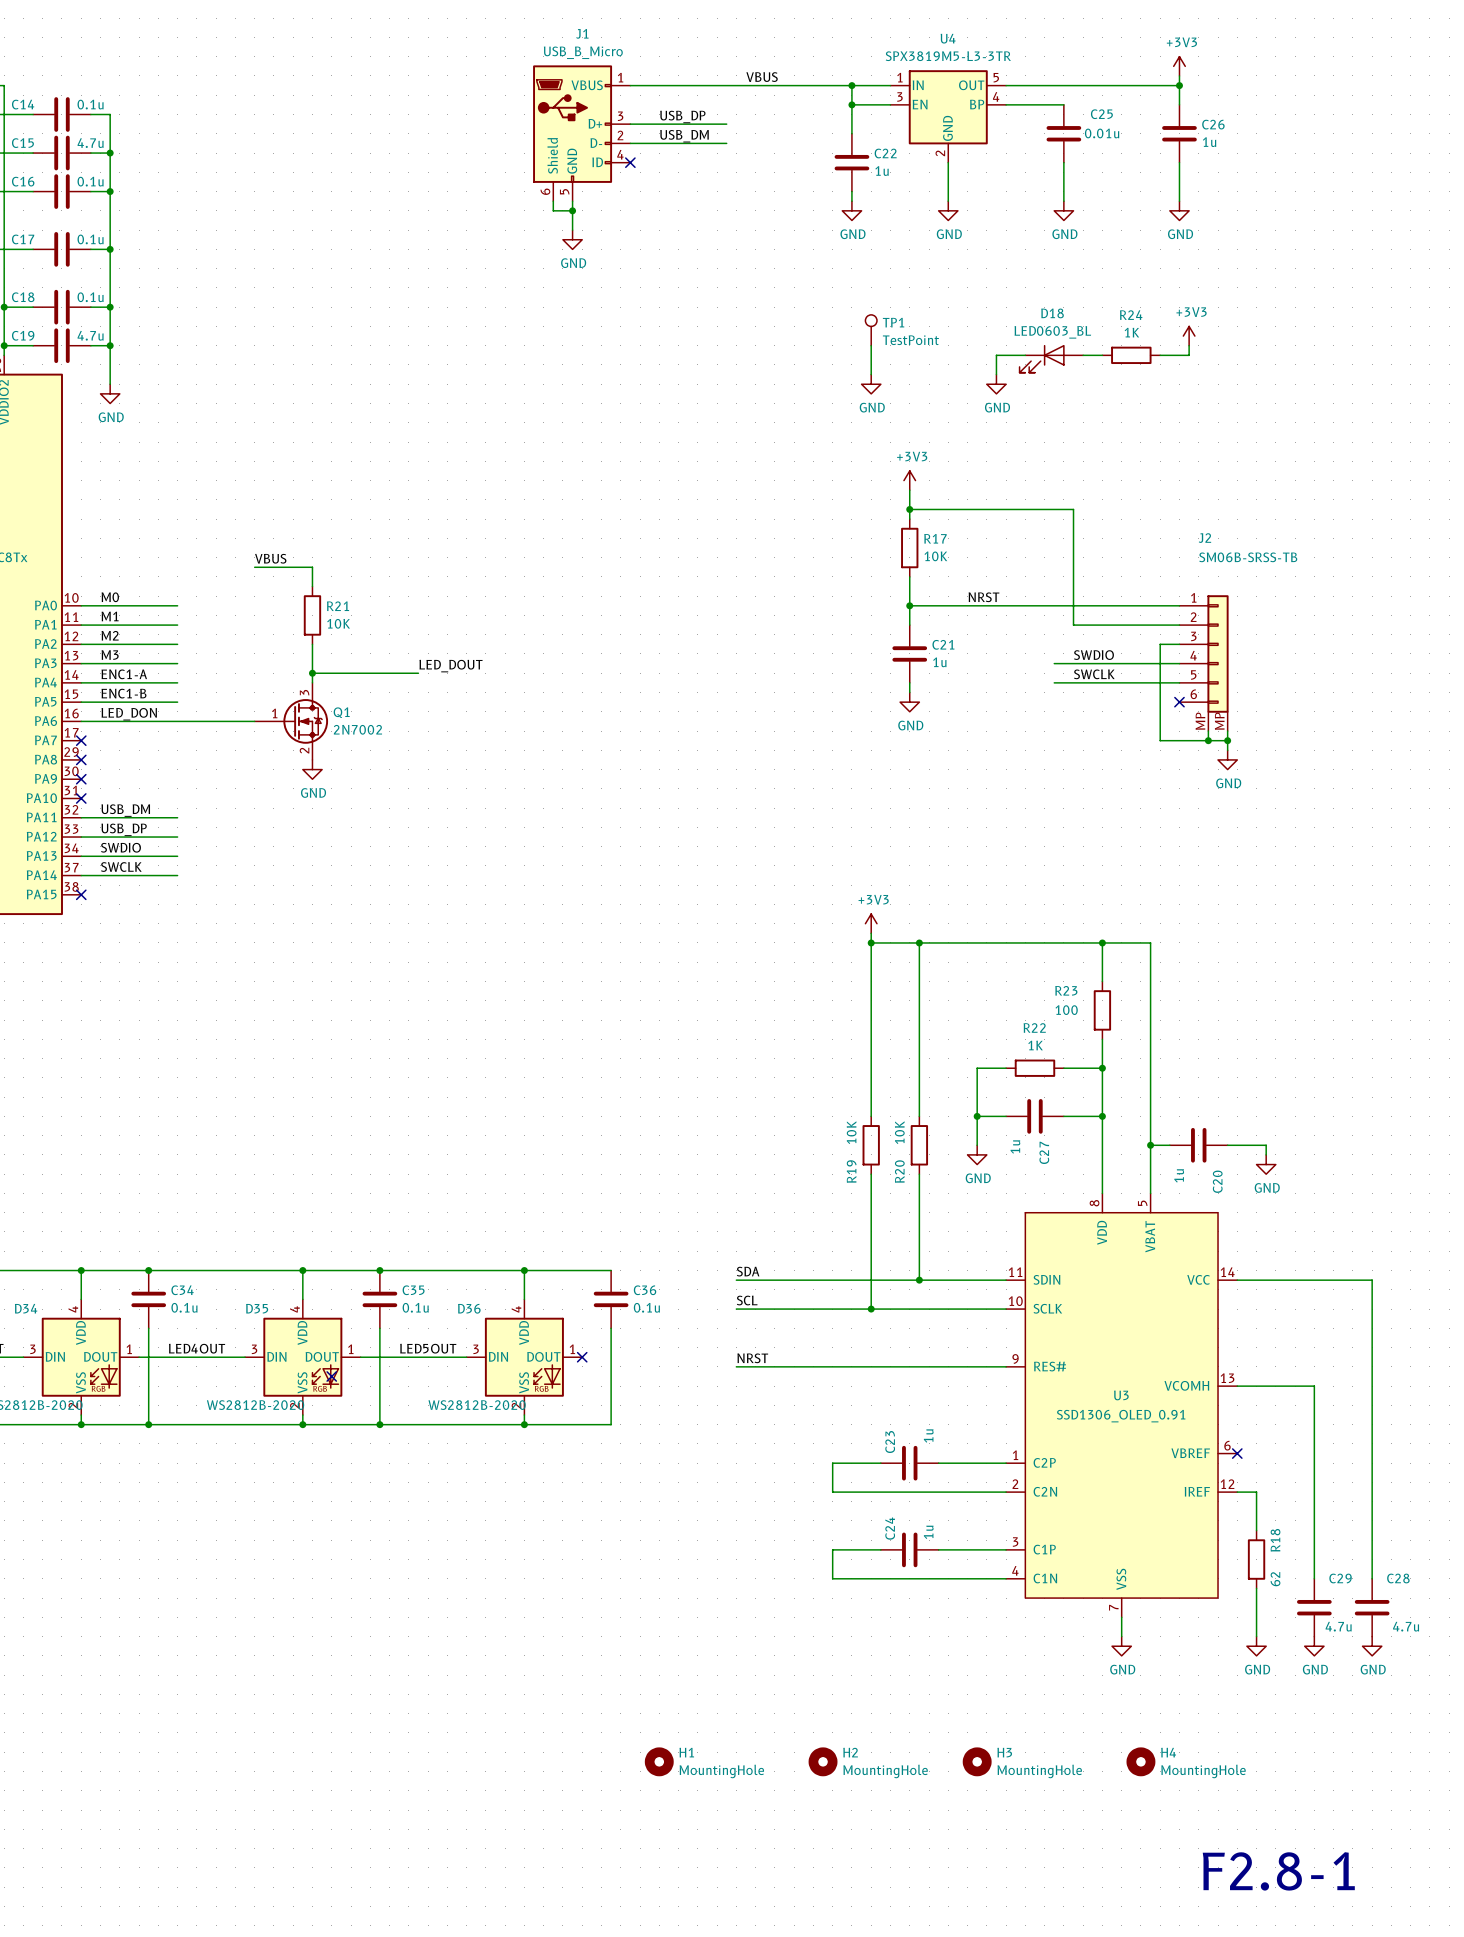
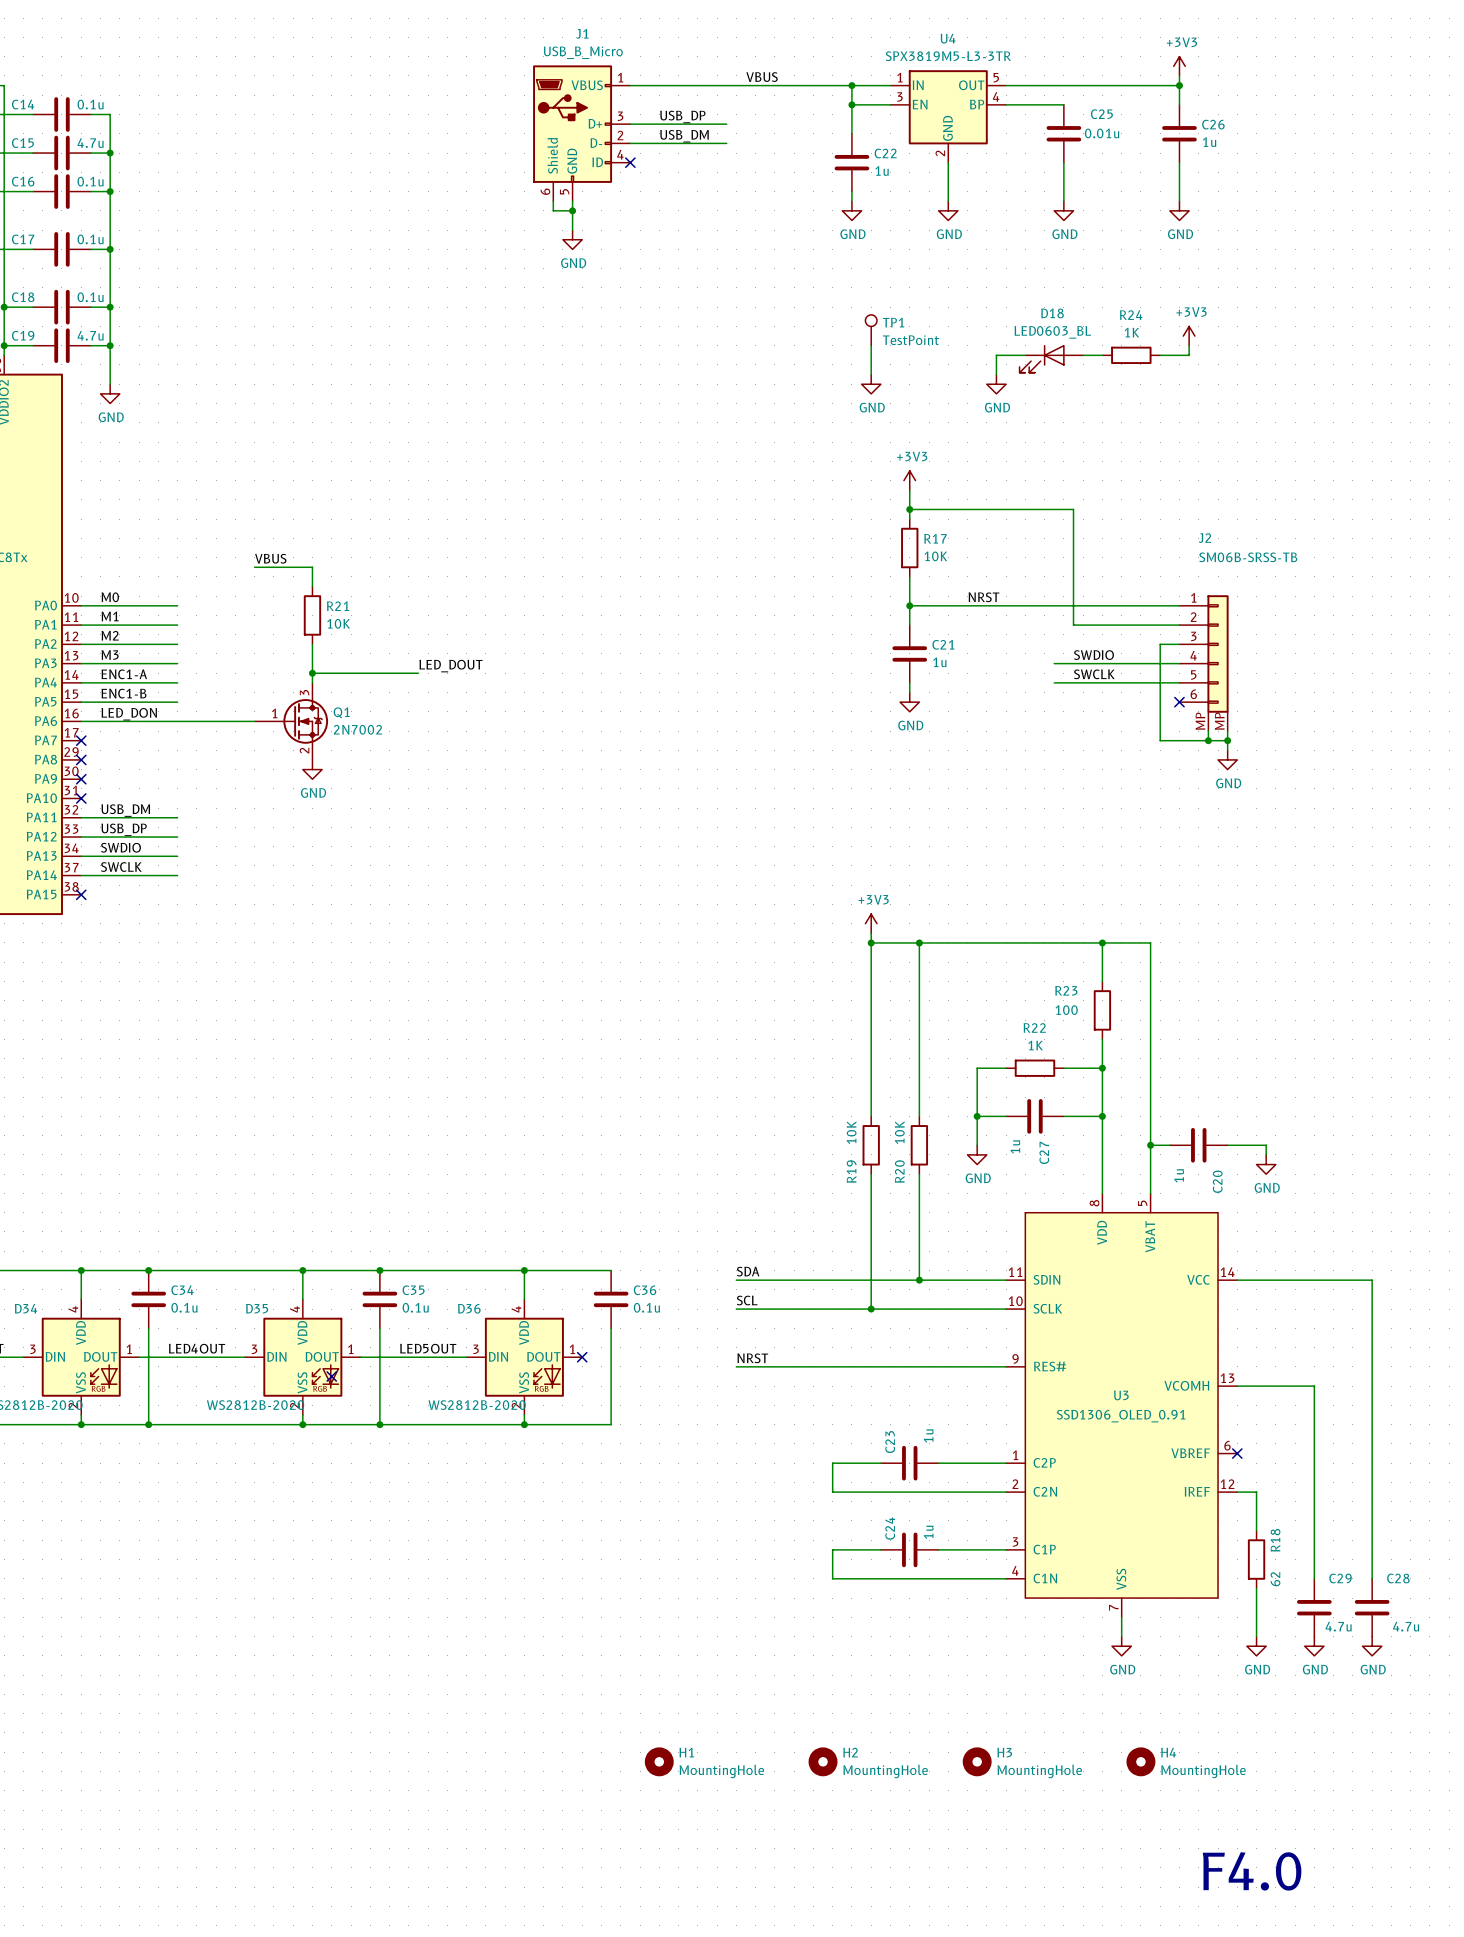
text: F2.8-1 (1278, 1871) -> F4.0 (1252, 1871)

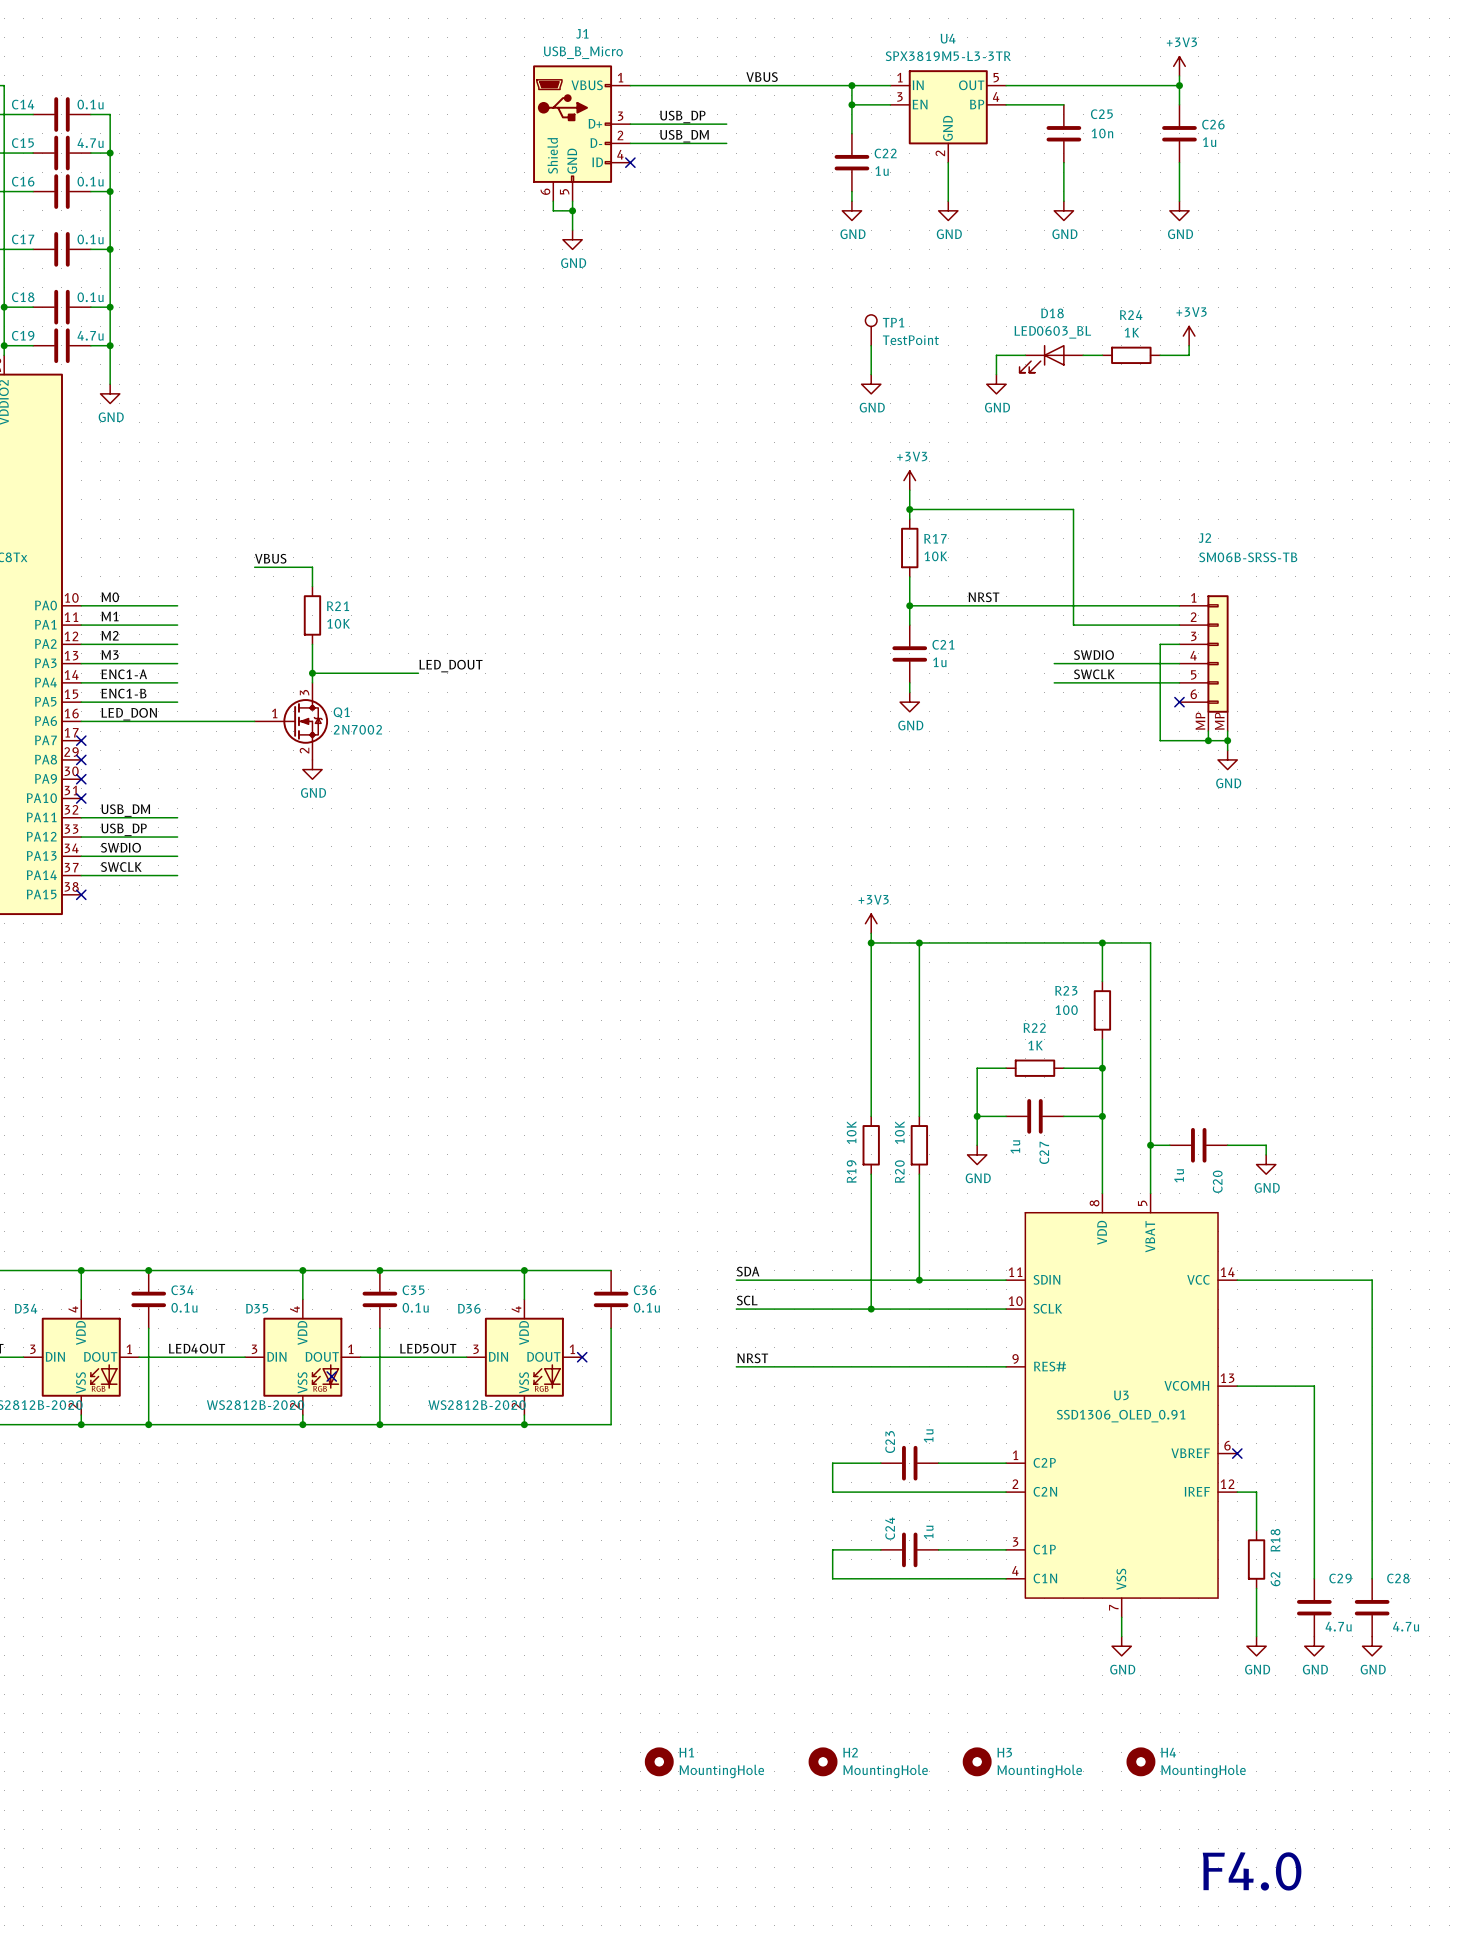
C25 value: 0.01u (1102, 133) -> 10n (1102, 133)

